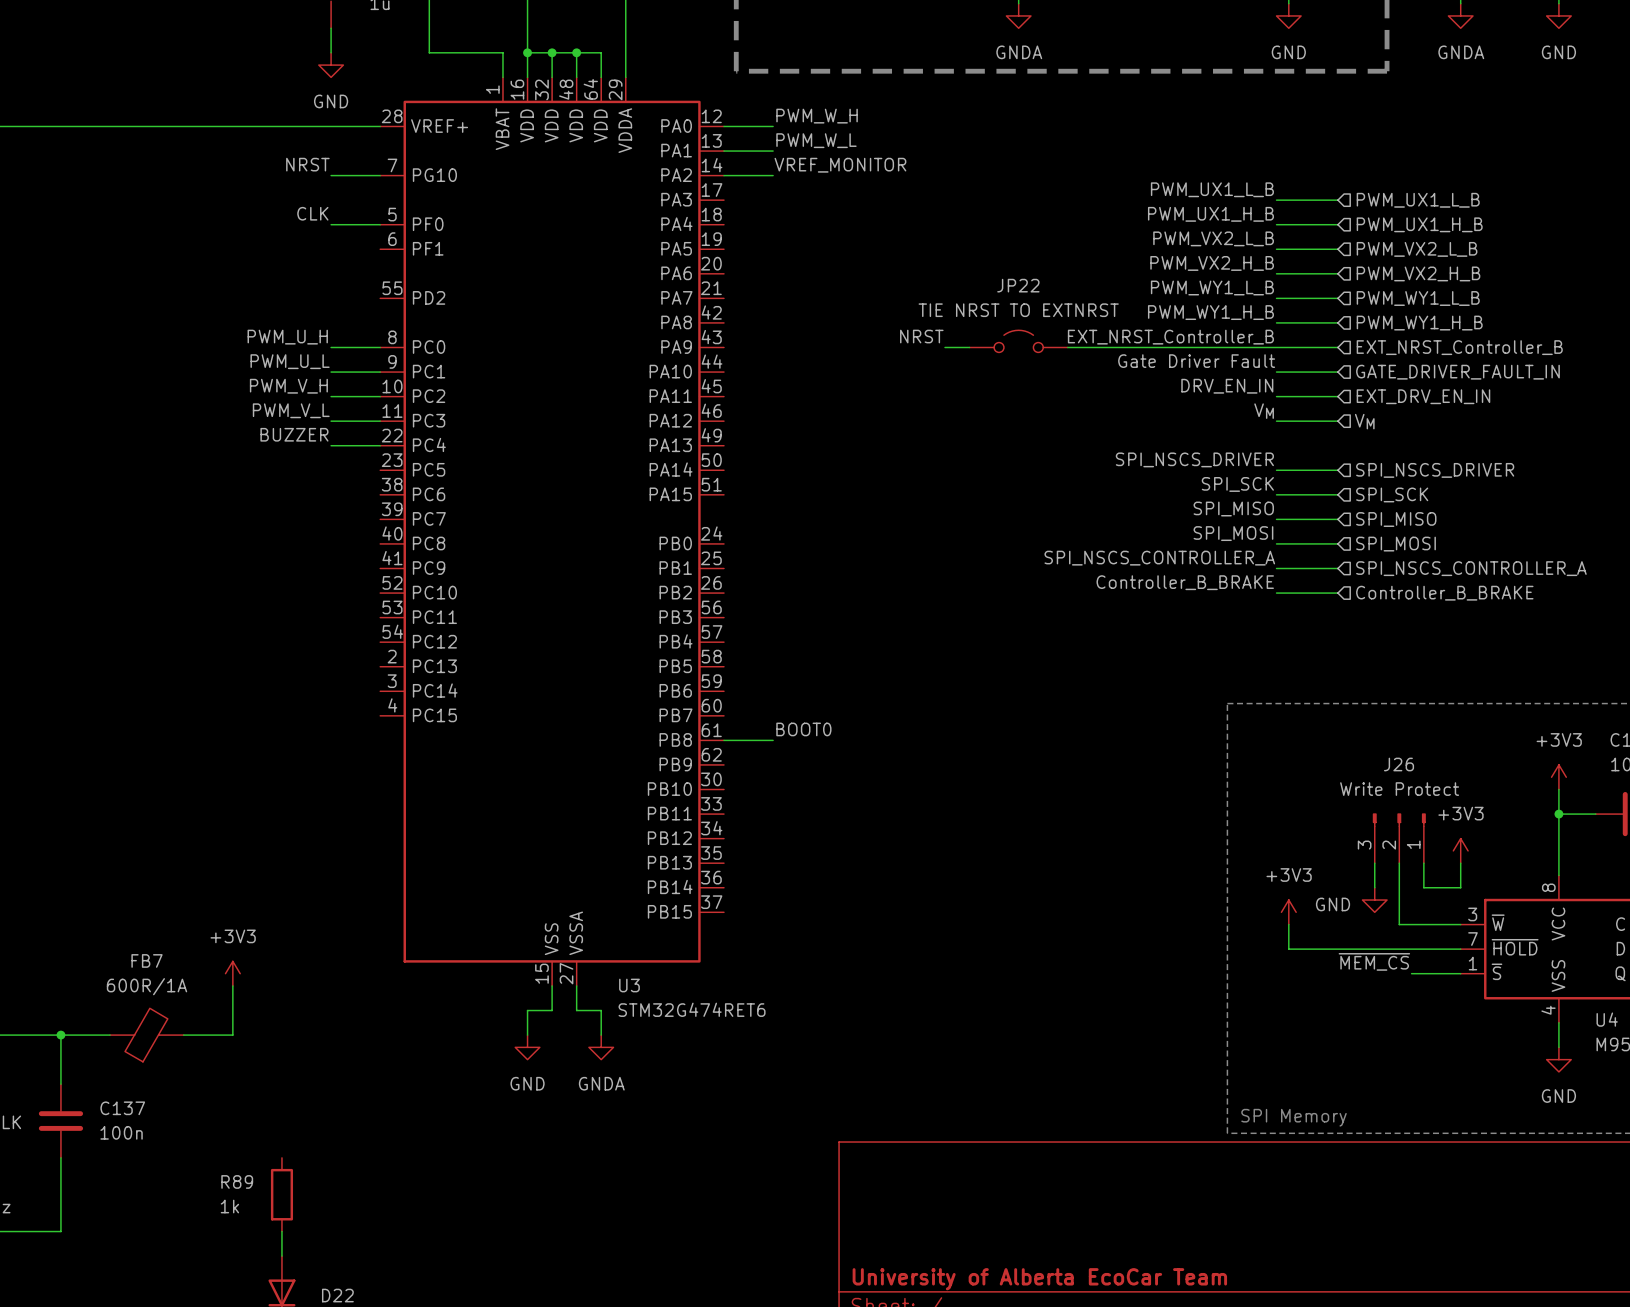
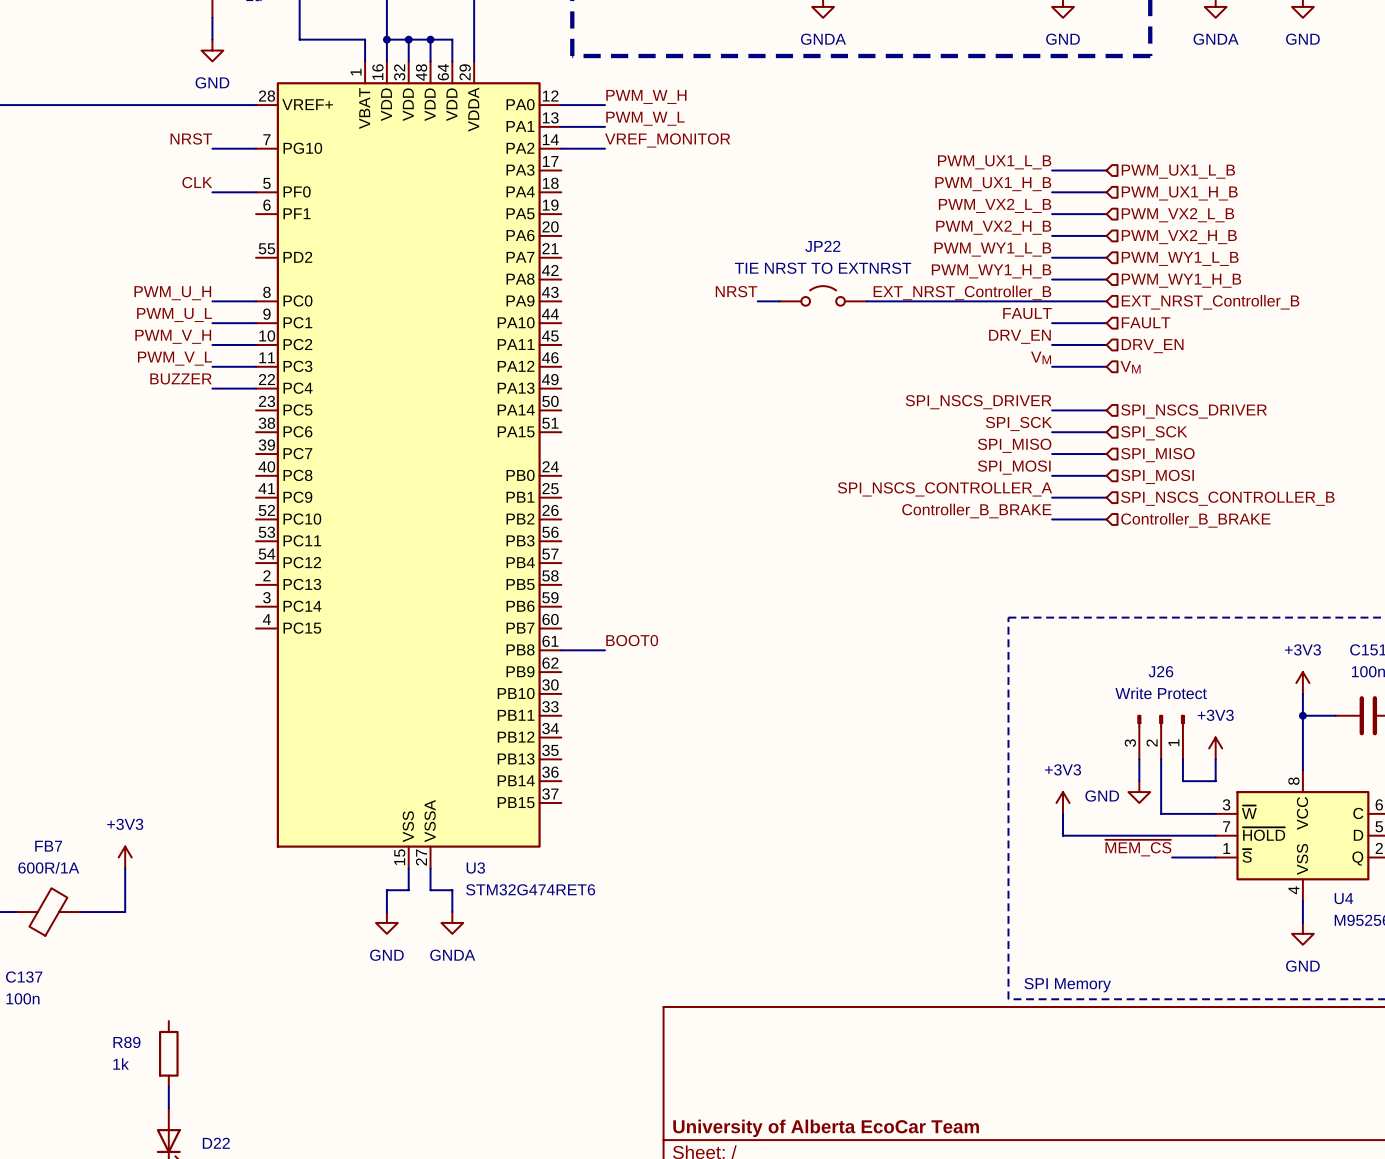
label: Gate Driver Fault (1196, 361) -> FAULT (1027, 313)
hierarchical label: GATE_DRIVER_FAULT_IN (1457, 372) -> FAULT (1146, 322)
label: DRV_EN_IN (1227, 386) -> DRV_EN (1019, 336)
hierarchical label: EXT_DRV_EN_IN (1423, 396) -> DRV_EN (1152, 346)
hierarchical label: SPI_NSCS_CONTROLLER_A (1471, 568) -> SPI_NSCS_CONTROLLER_B (1227, 498)

